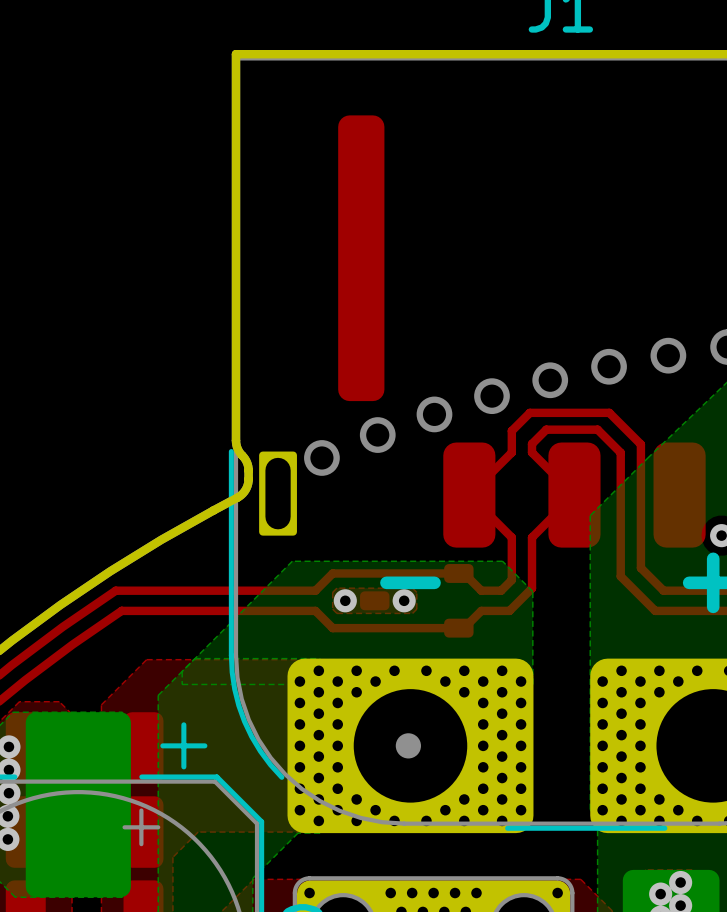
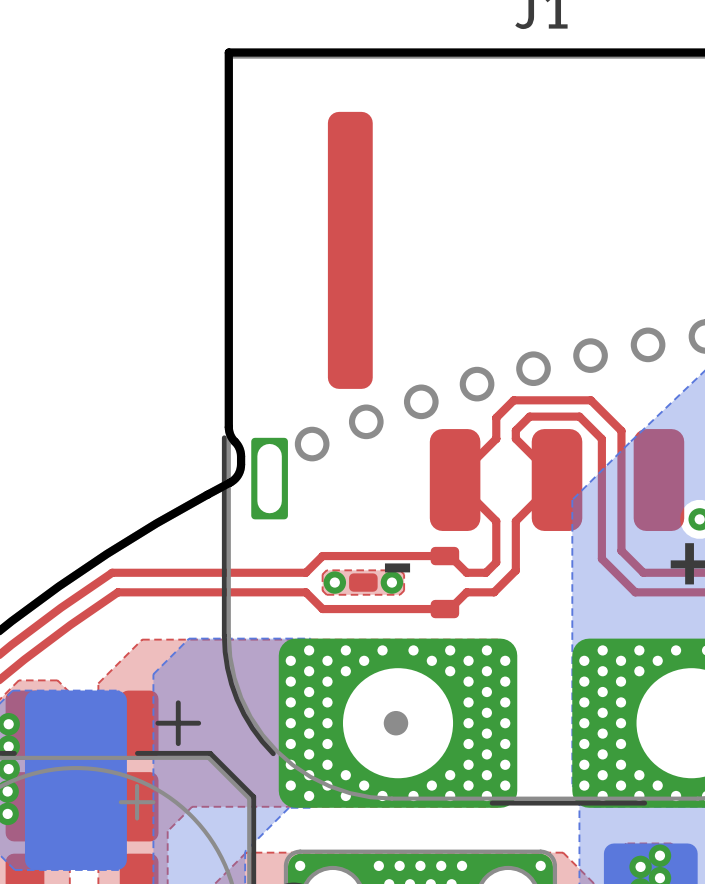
bottom zone outline: (195, 658) (292, 561) (502, 561) (532, 591) (532, 684) (182, 684) (182, 671) -> none

